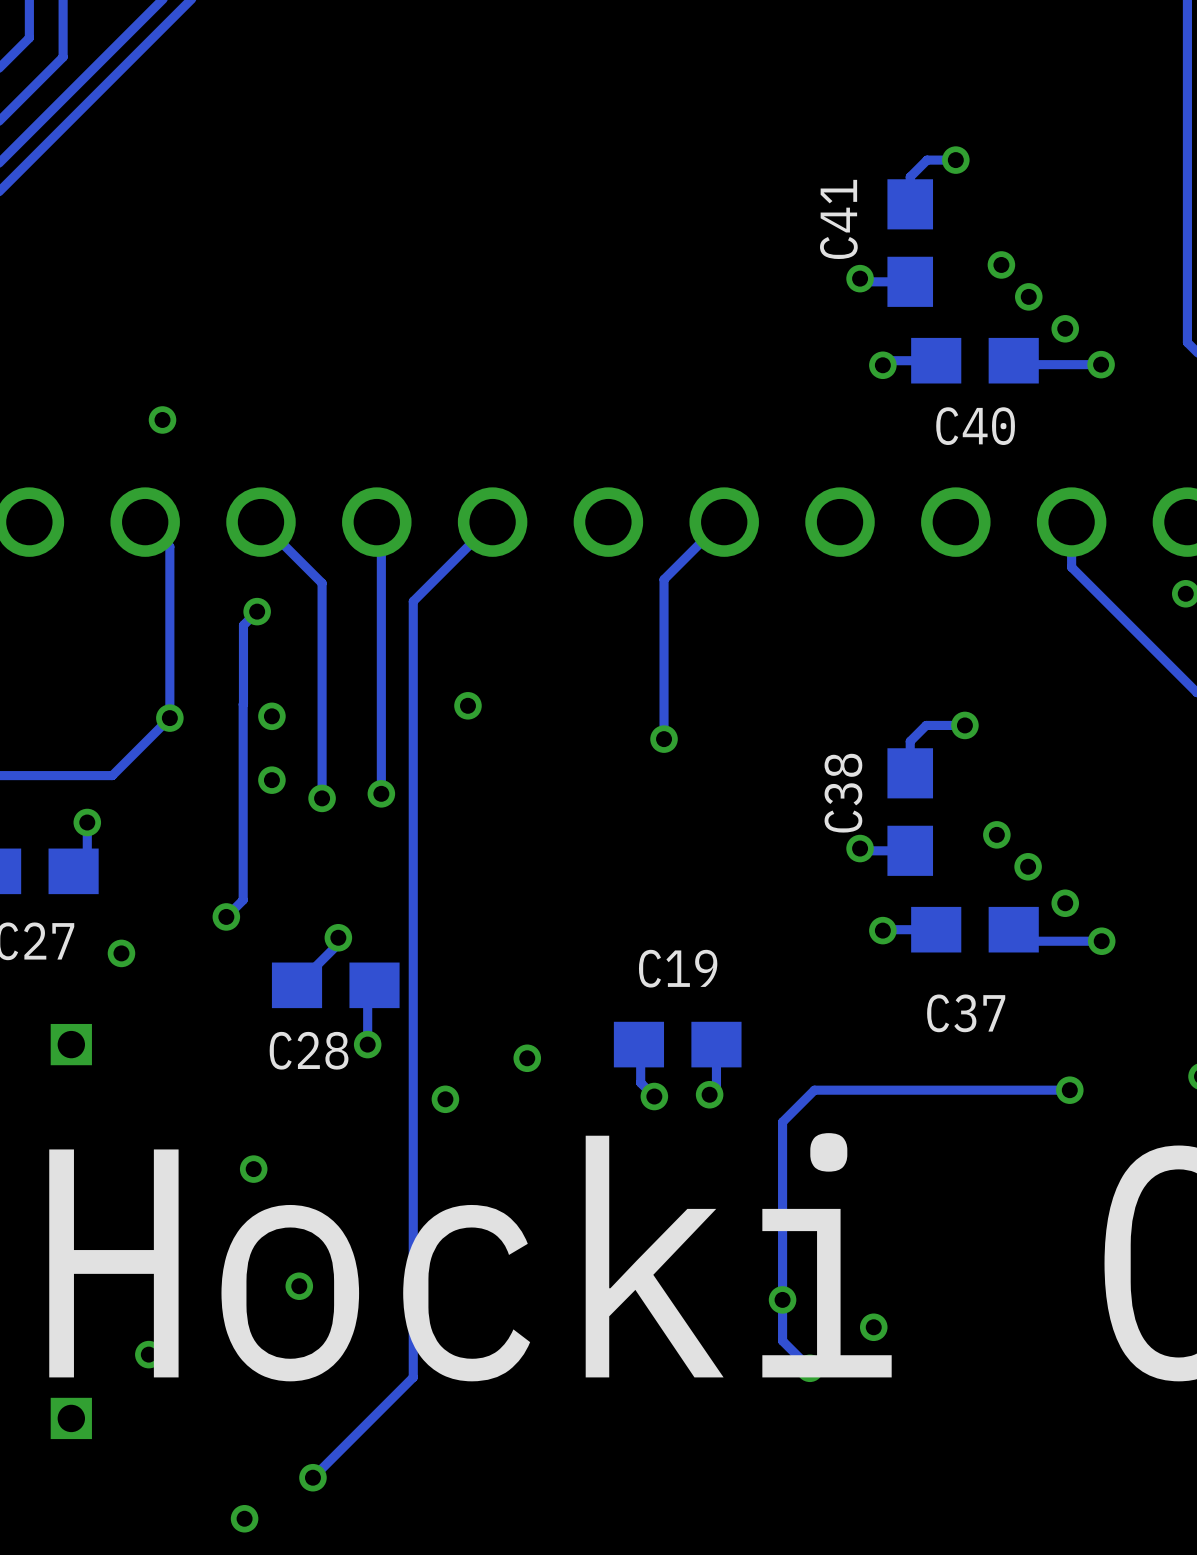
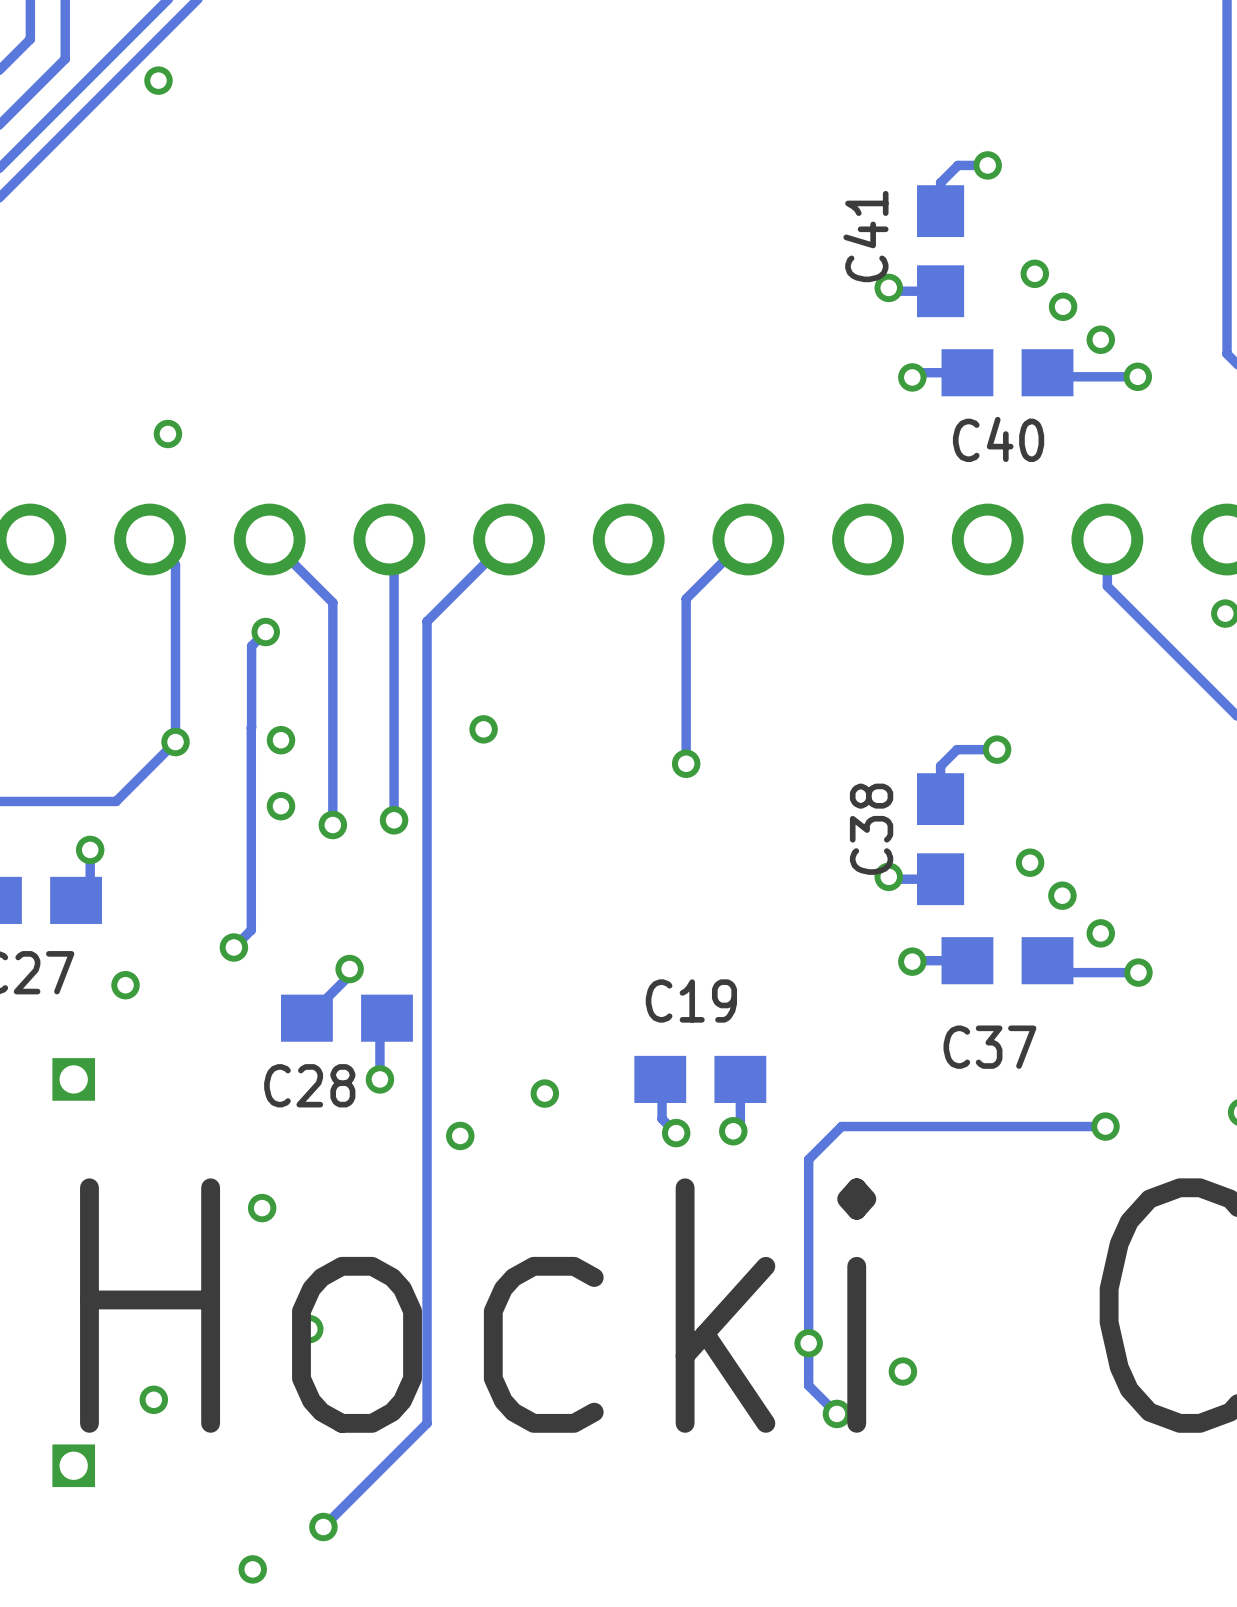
via: none -> (158, 80)

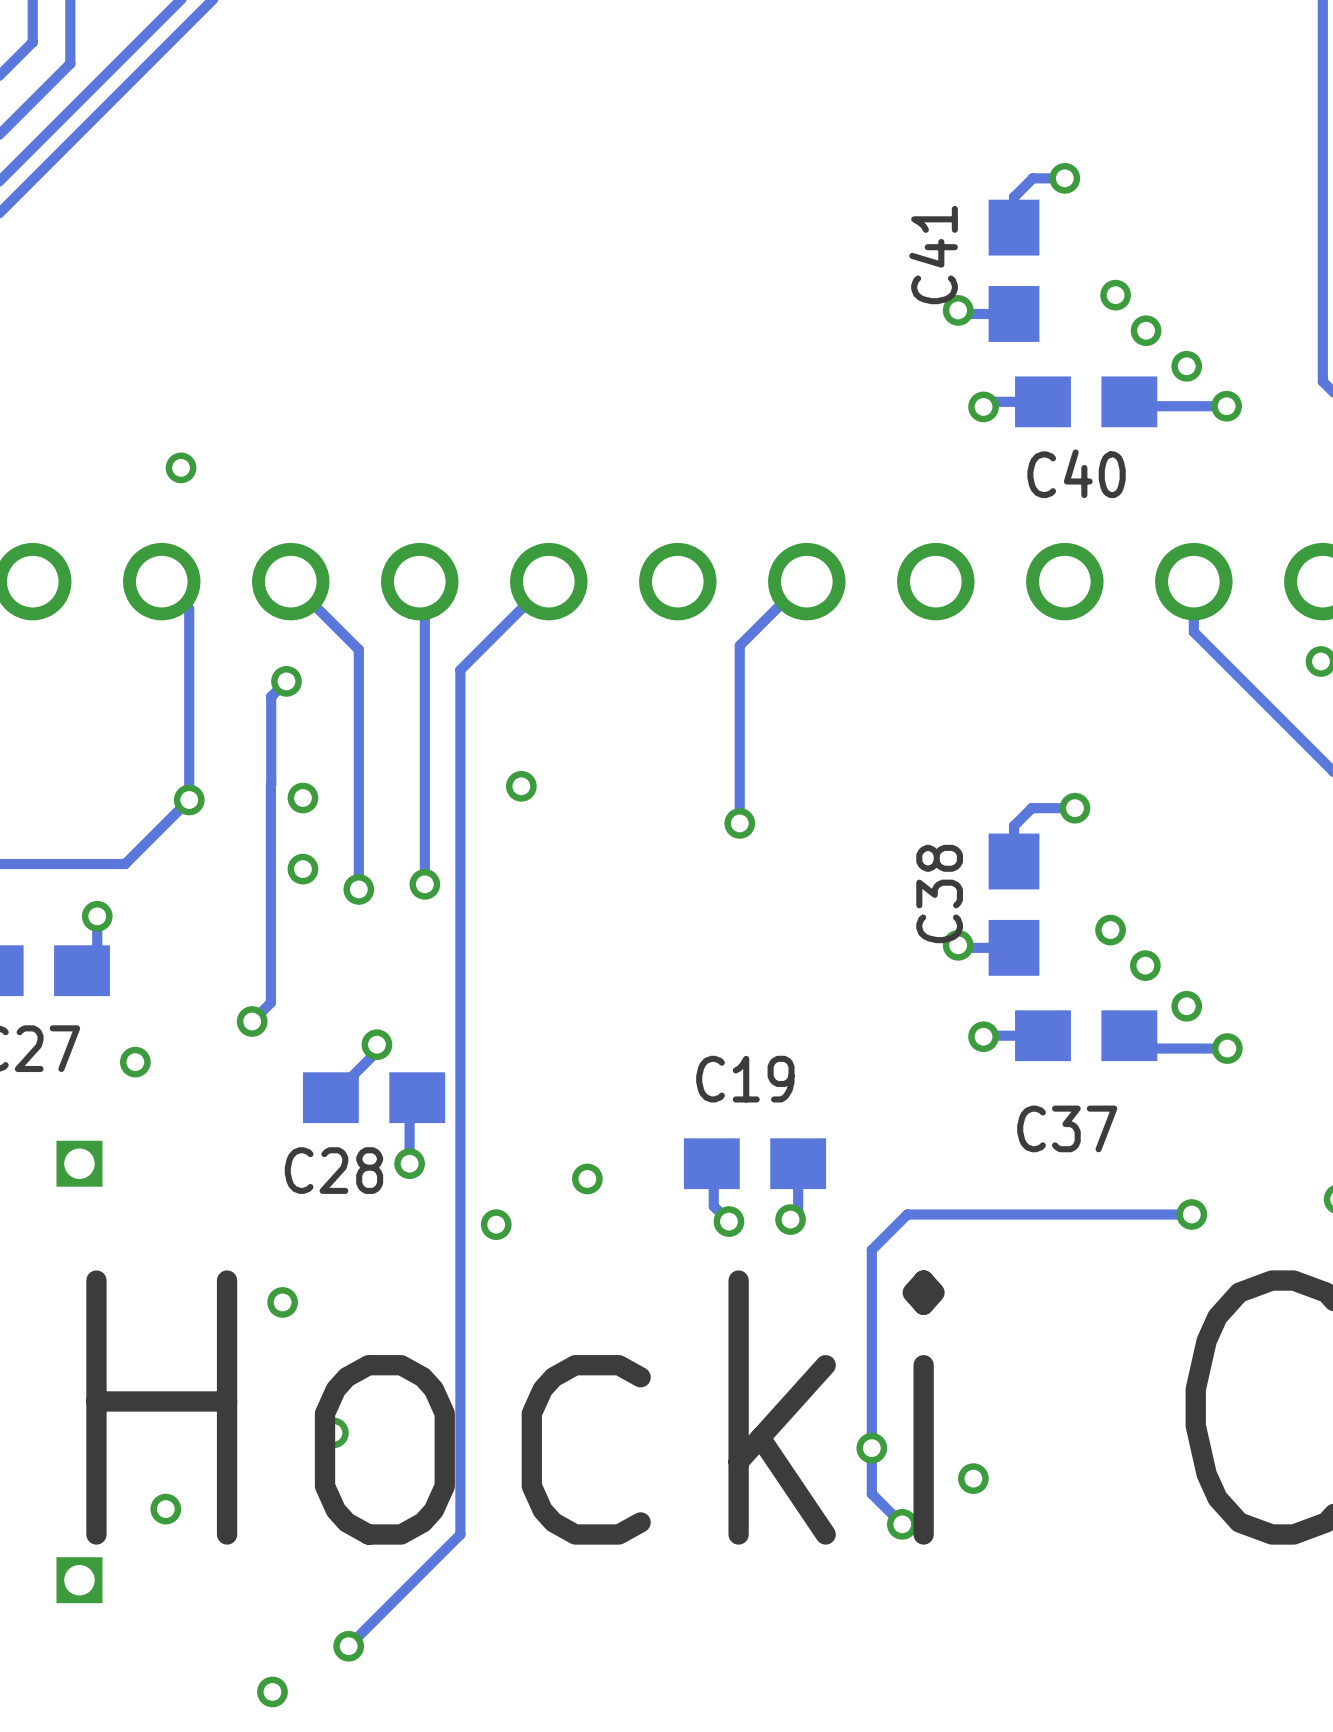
via: (158, 80) -> none

